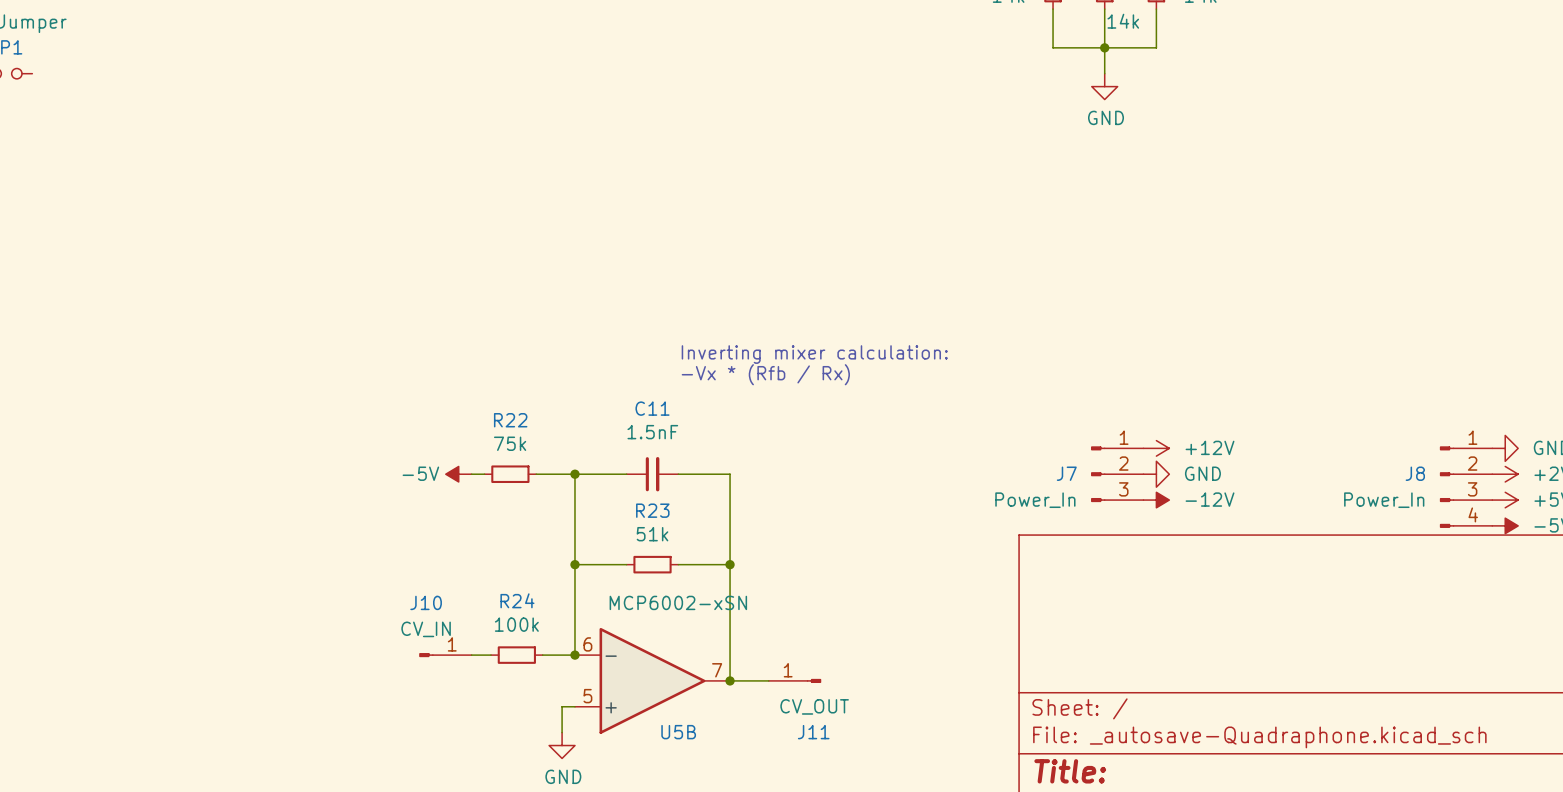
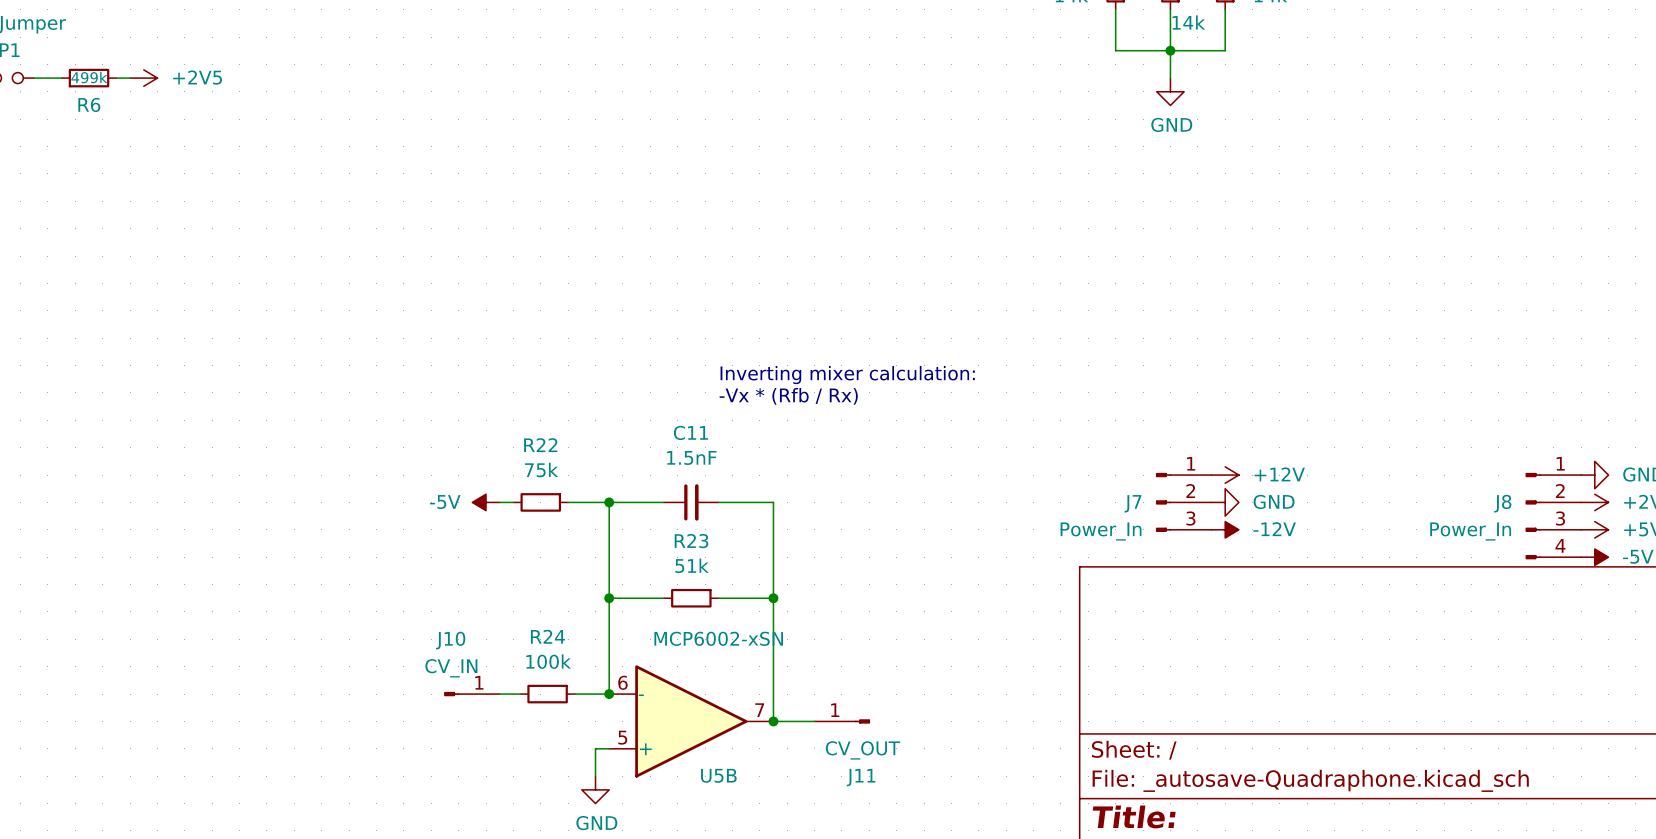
wire: none -> (34, 78) (61, 78)
R6: none -> 499k (89, 78)
wire: none -> (116, 78) (130, 78)
power symbol: none -> +2V5 (143, 78)

